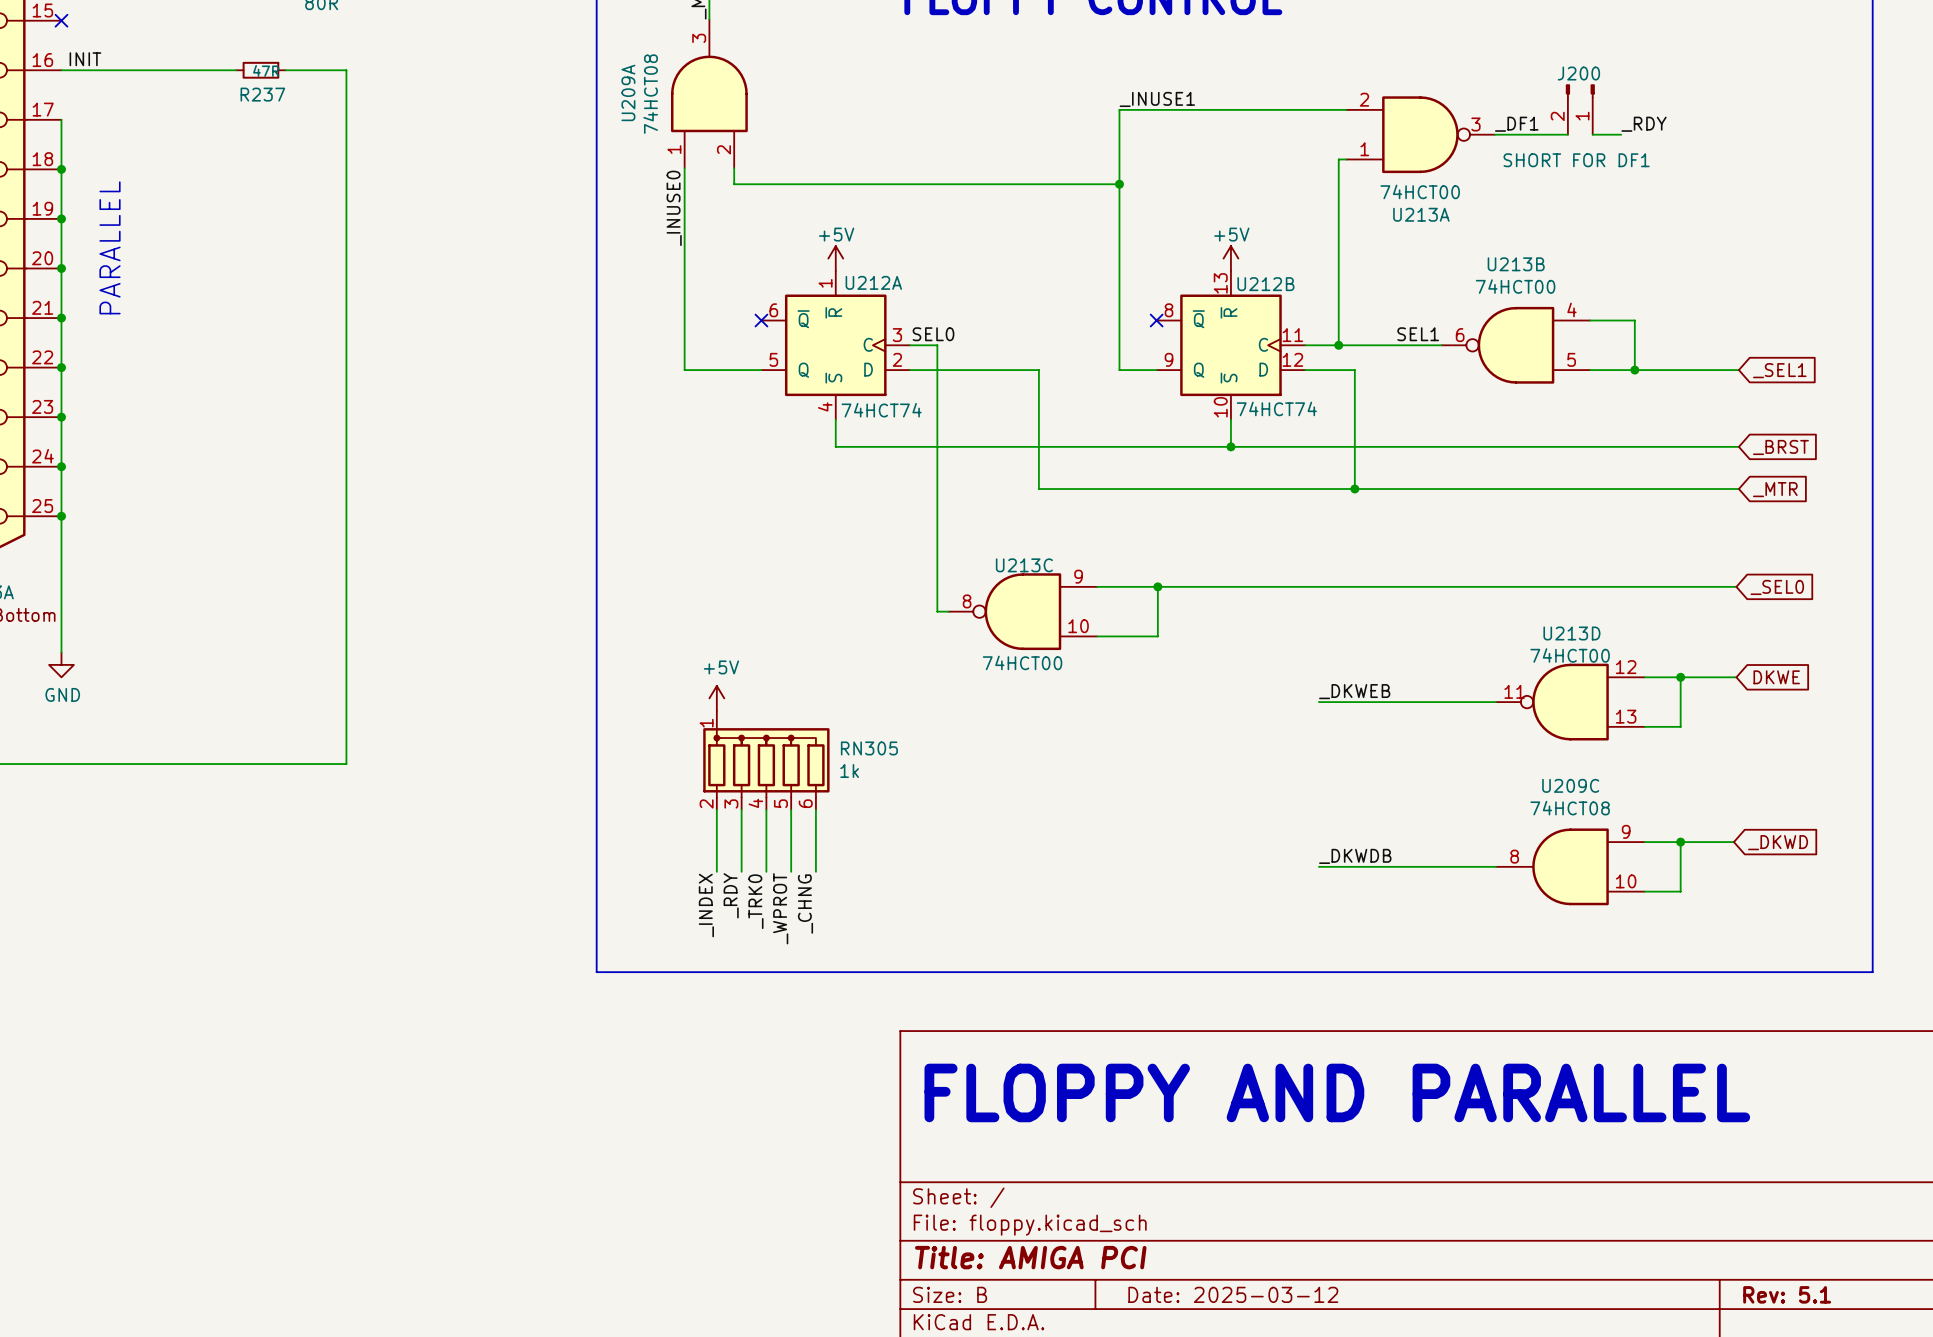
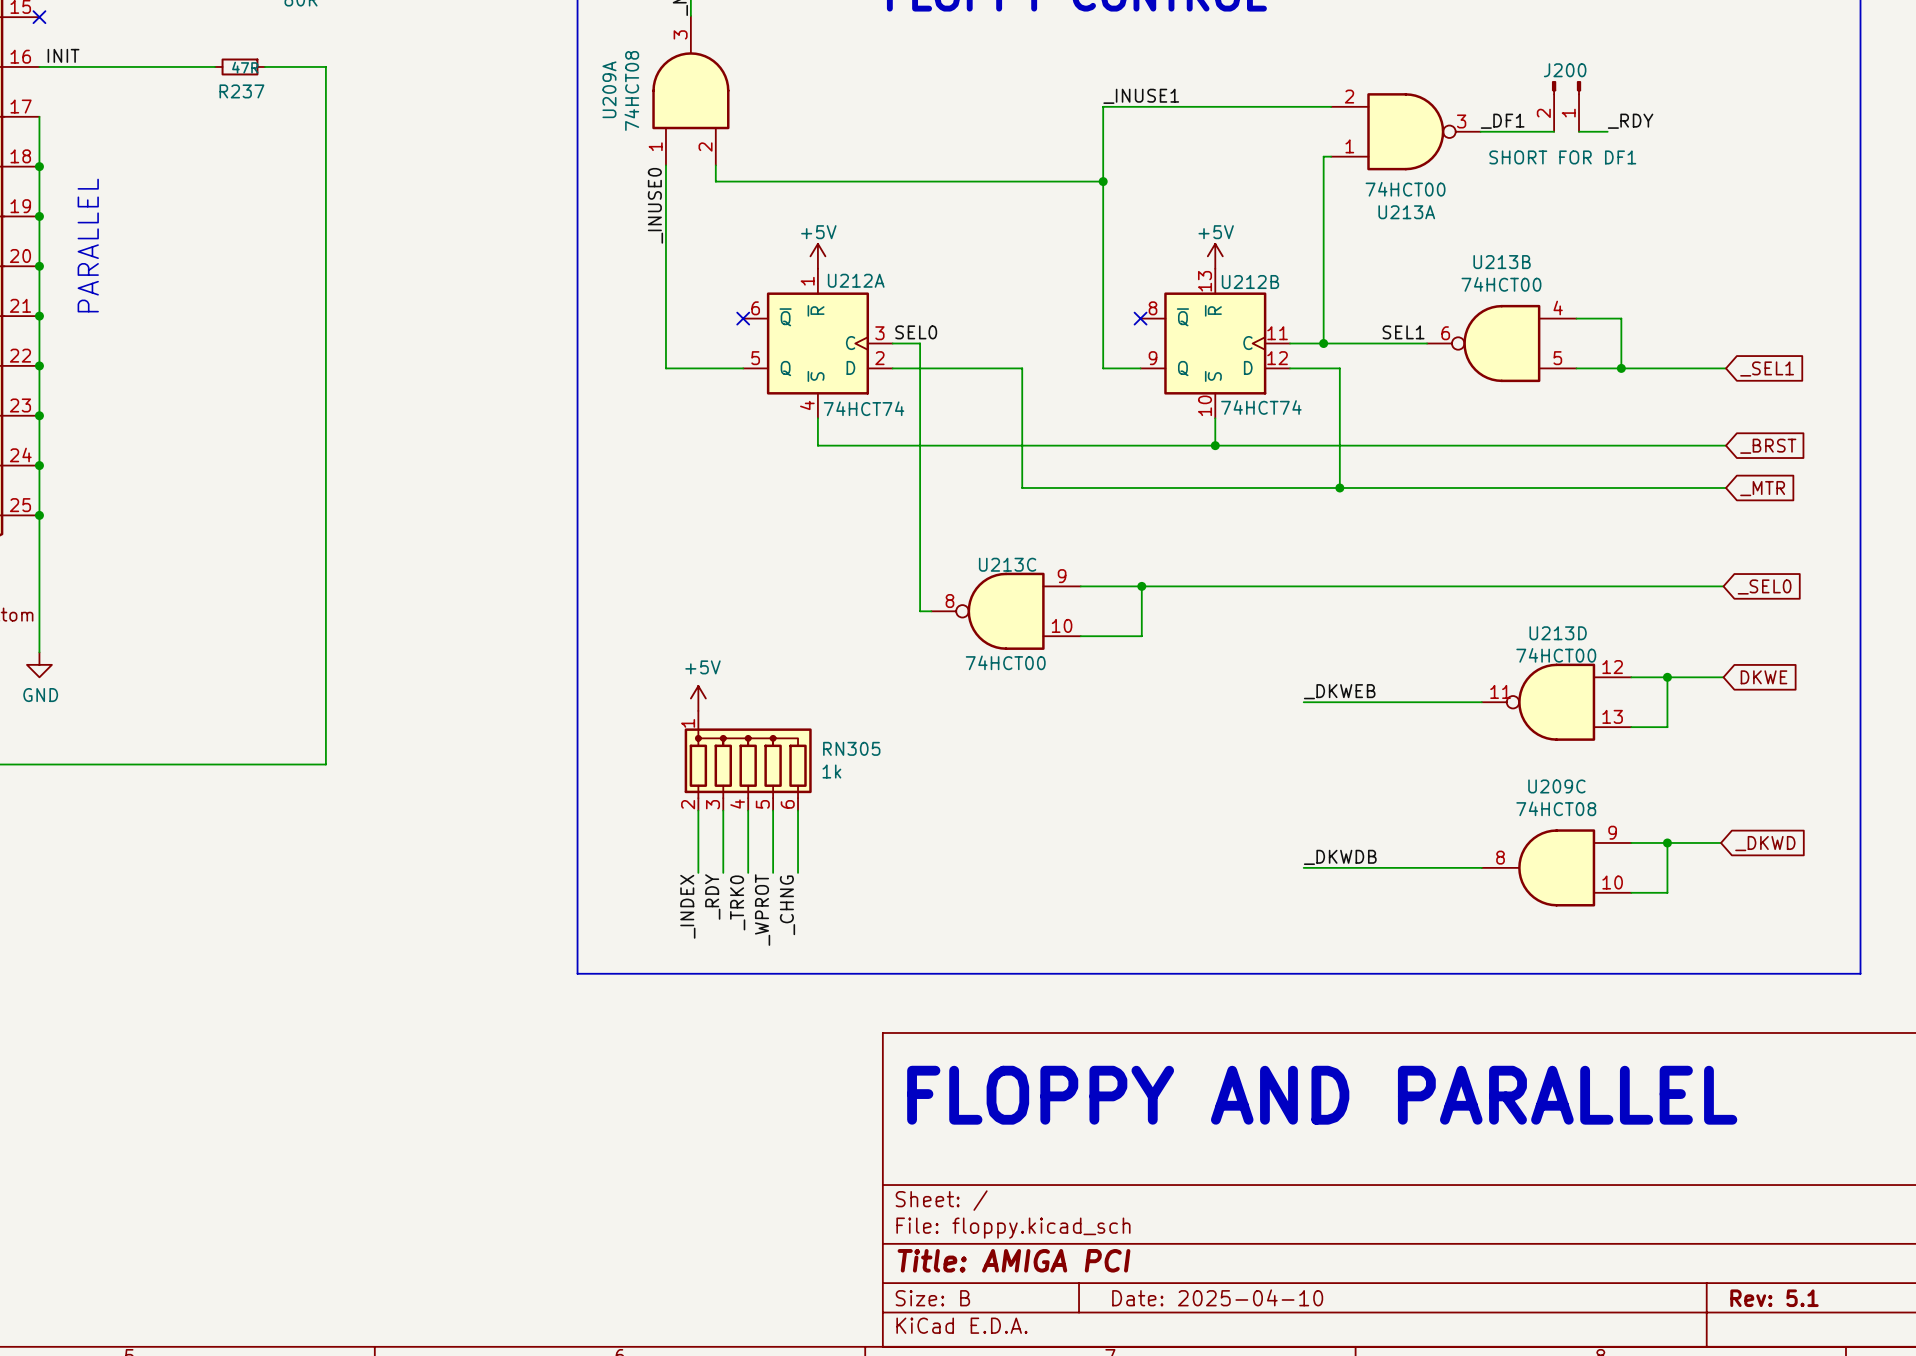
title block: Date: 2025-03-12 (1233, 1294) -> Date: 2025-04-10 (1217, 1297)

